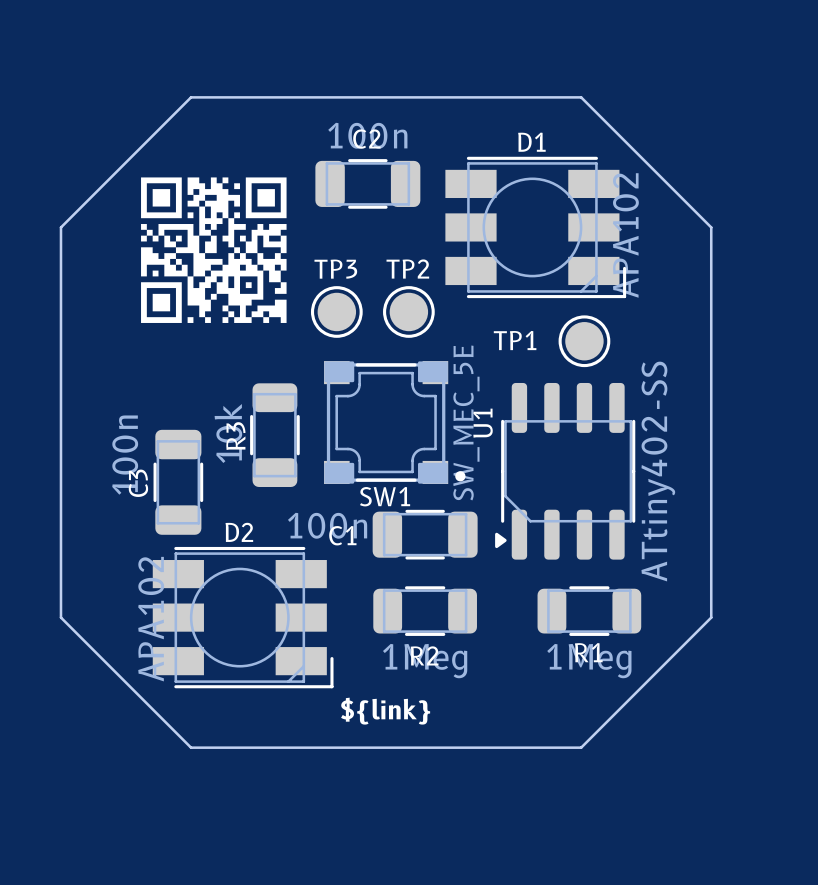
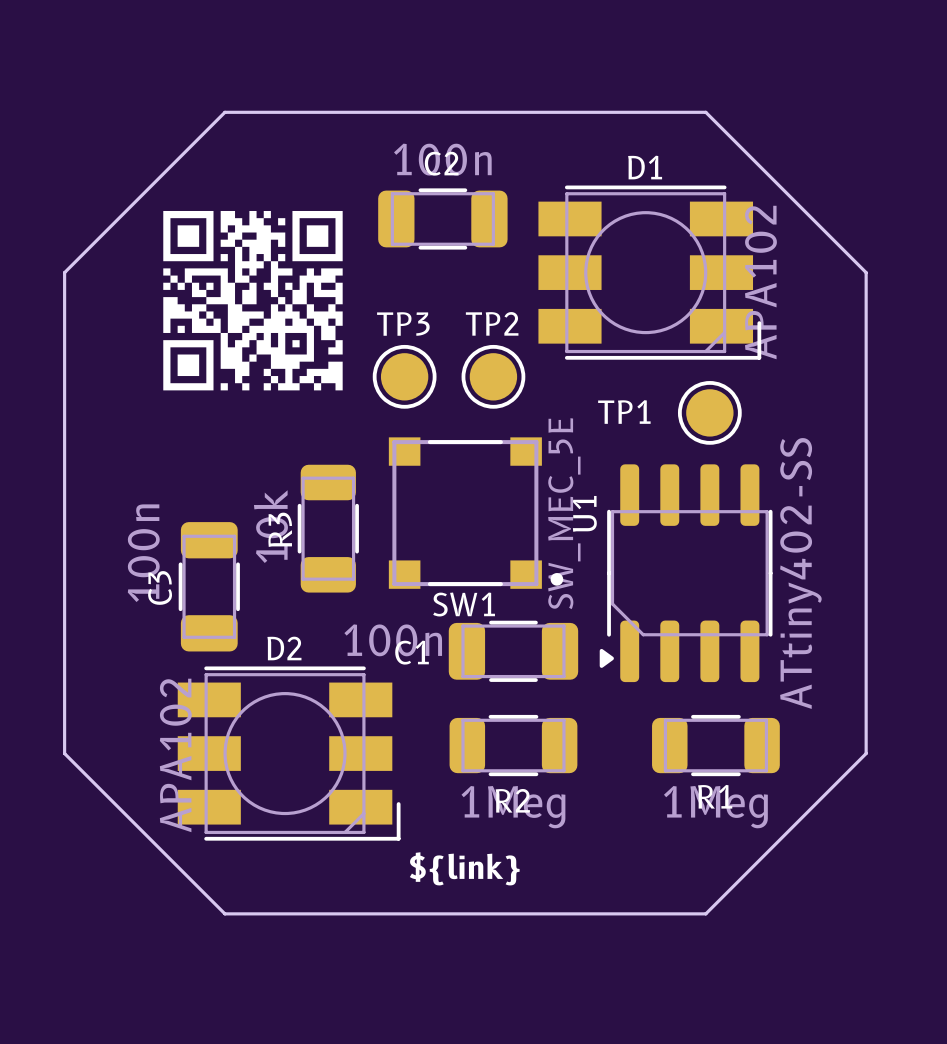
SW1 footprint: [324, 361, 466, 484] -> [388, 437, 564, 589]

